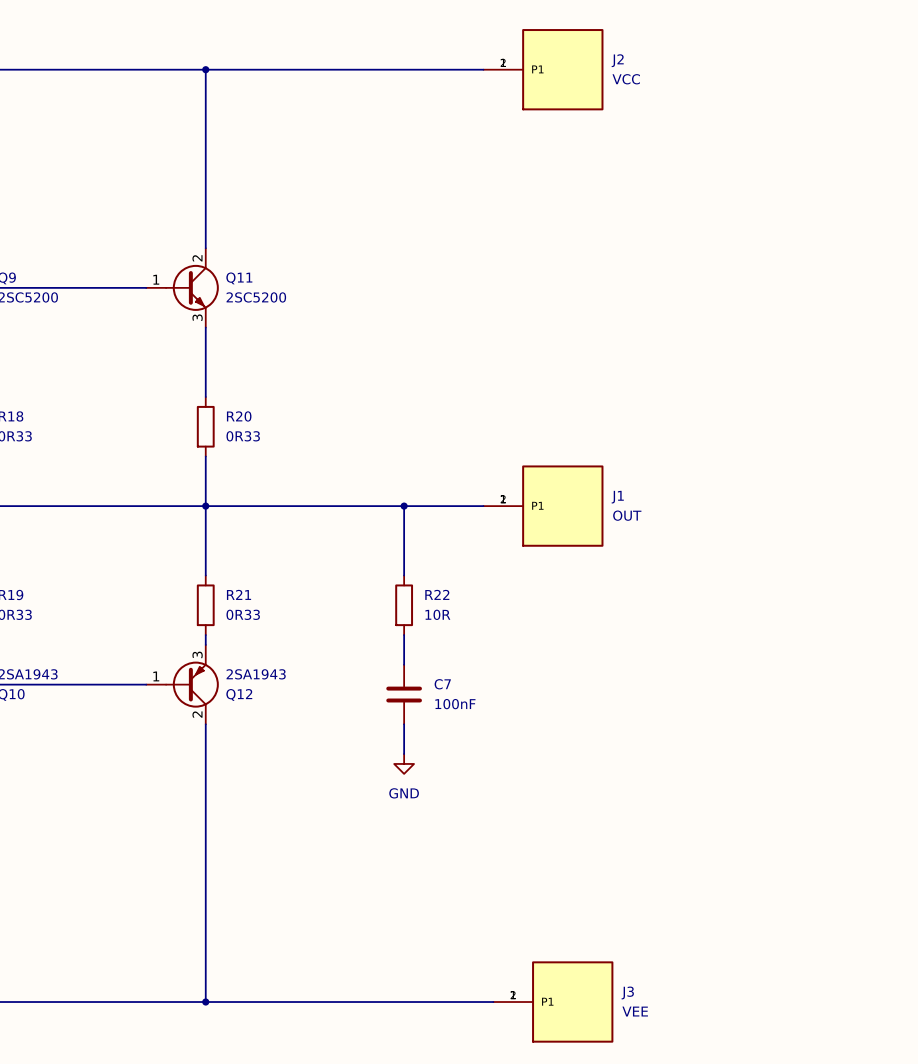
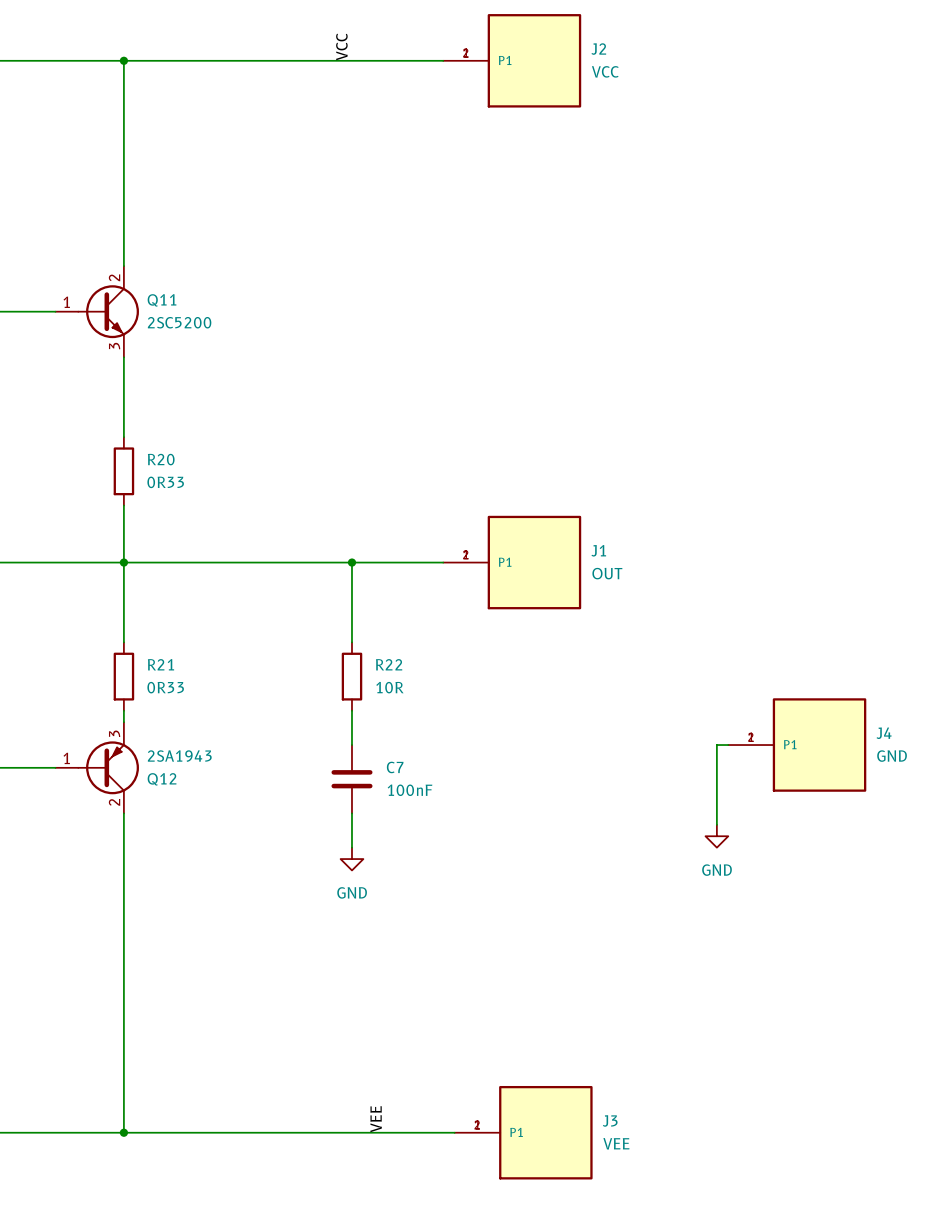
label: none -> VCC (341, 46)
wire: none -> (728, 745) (716, 745) (716, 824)
J4: none -> GND (797, 745)
power symbol: none -> GND (716, 836)
label: none -> VEE (376, 1119)

